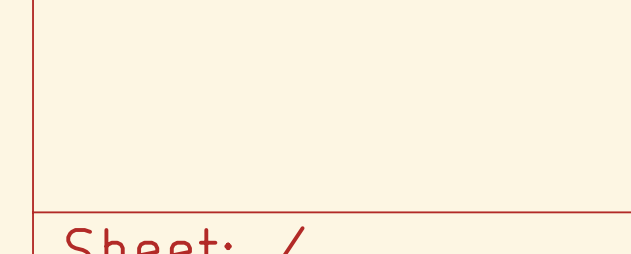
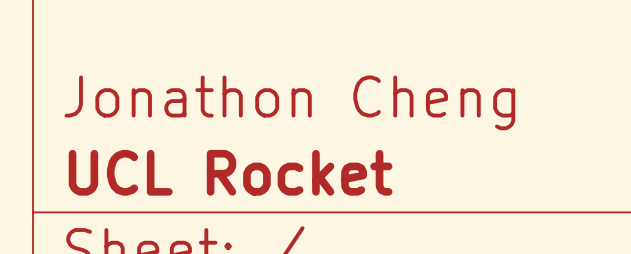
title block: none -> Jonathon Cheng (289, 102)
title block: none -> UCL Rocket (230, 172)

